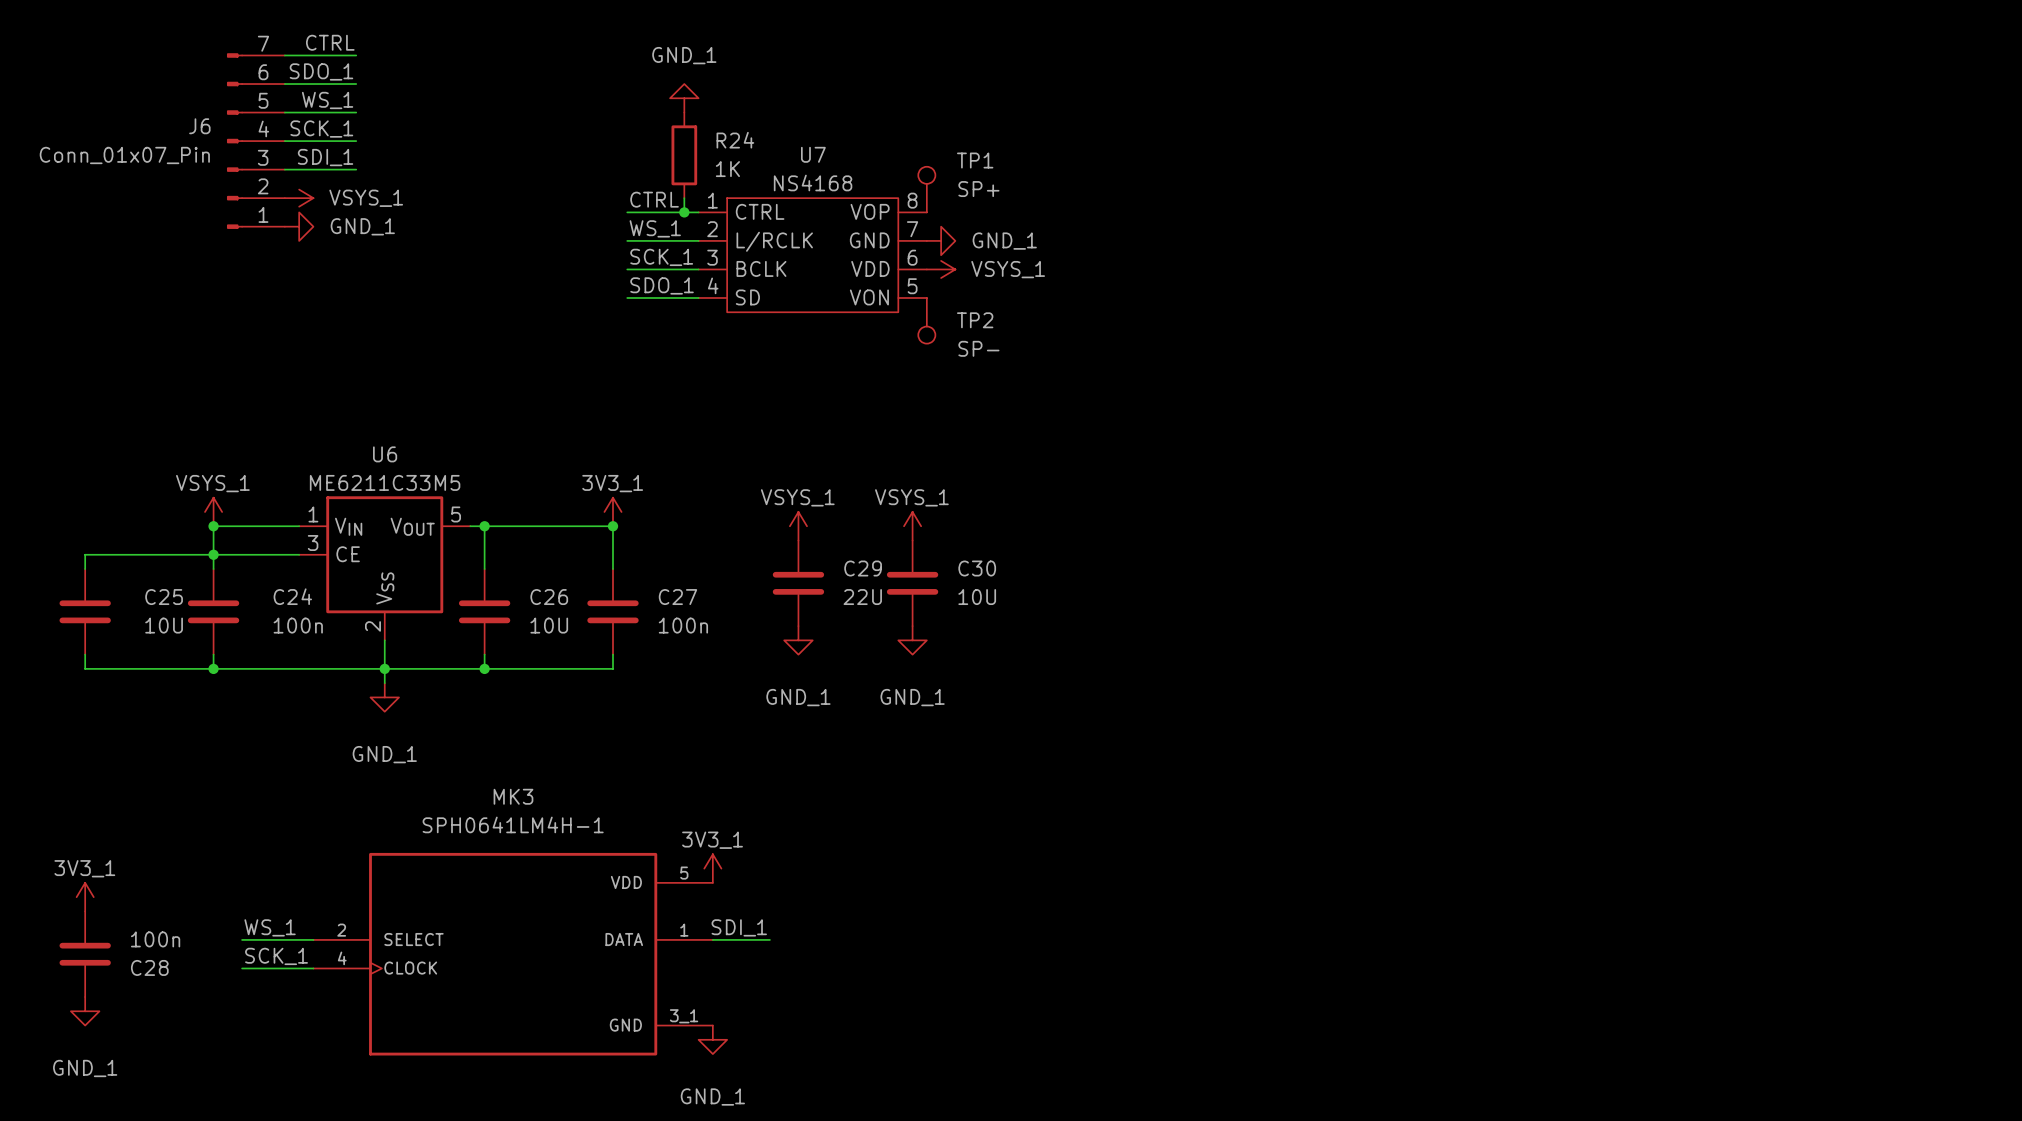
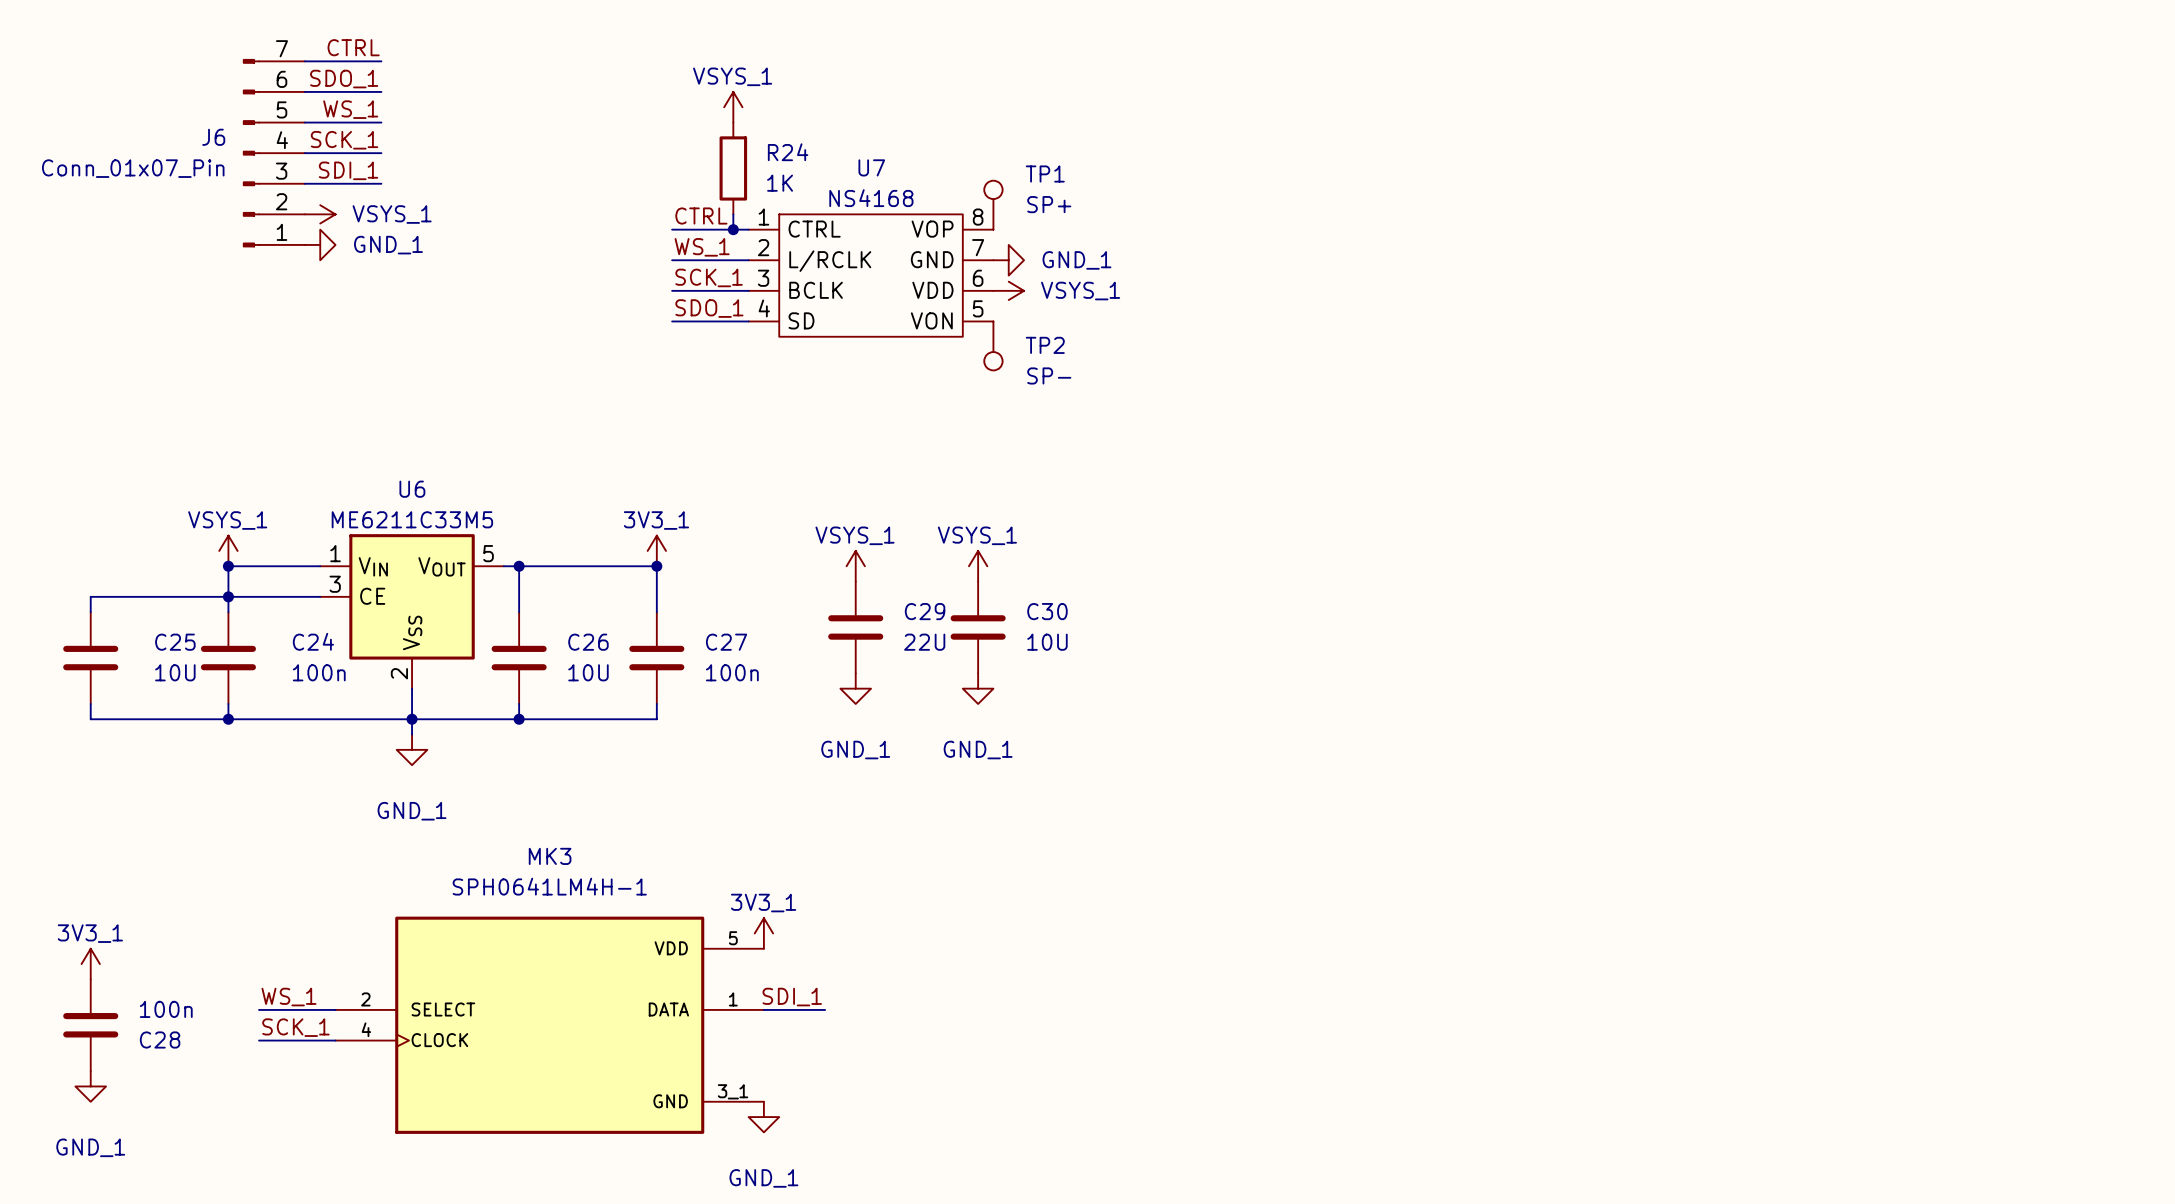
power symbol: GND_1 (684, 98) -> VSYS_1 (733, 107)

